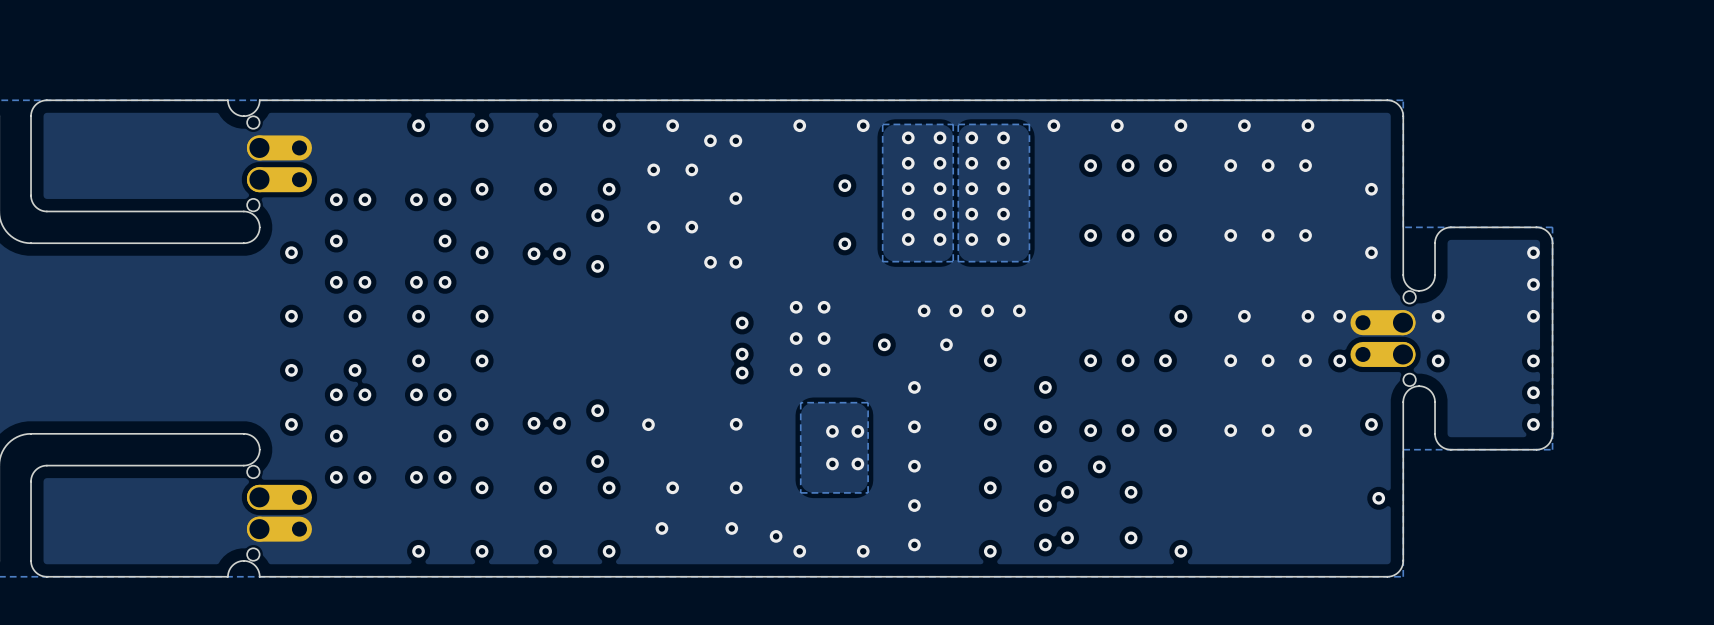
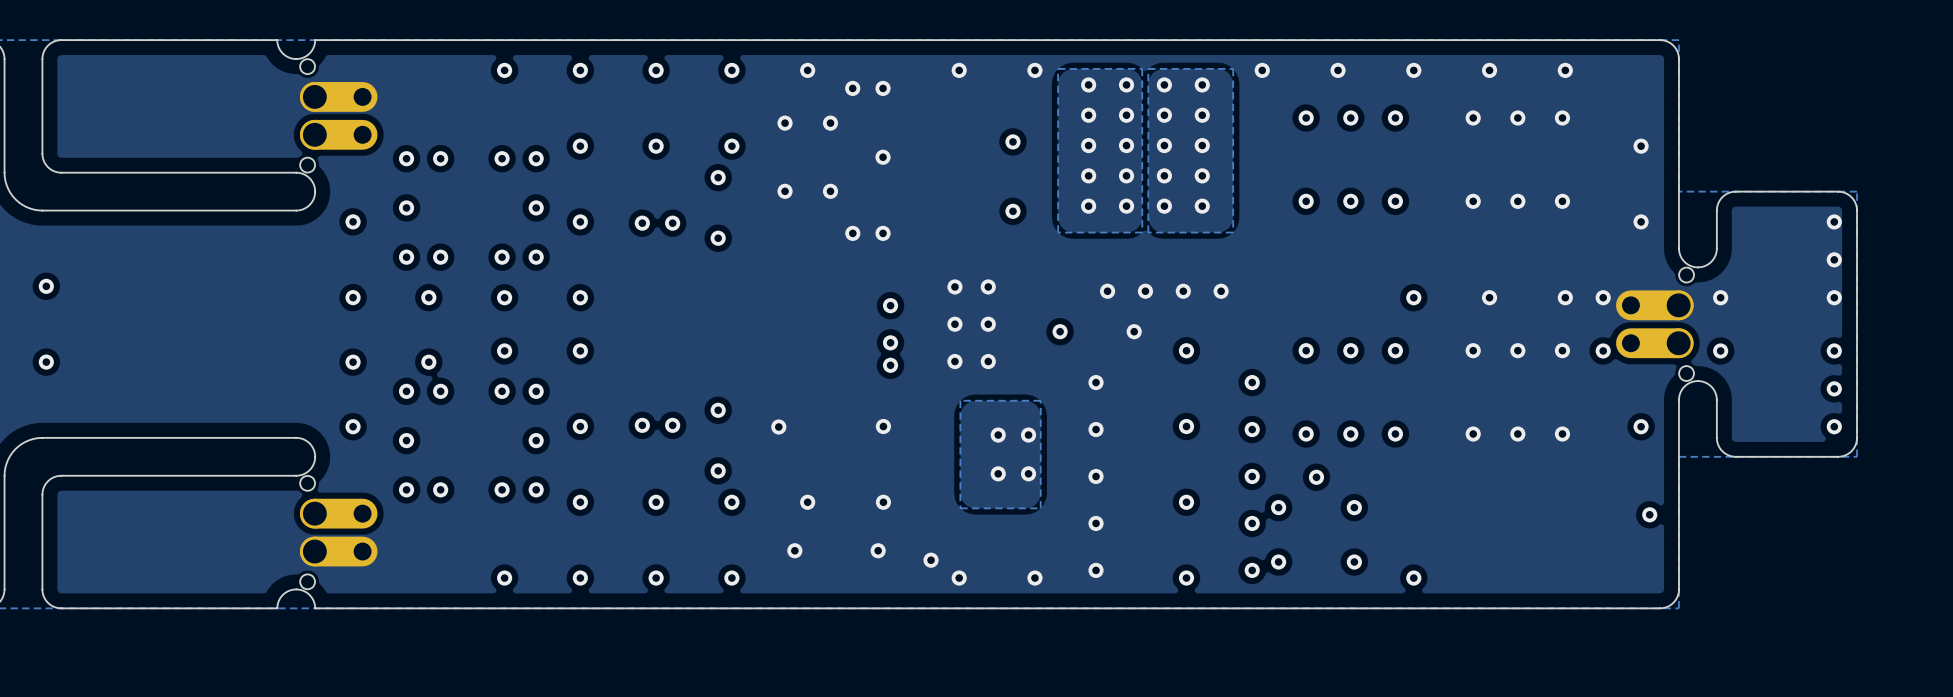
via: none -> (46, 286)
via: none -> (46, 362)

